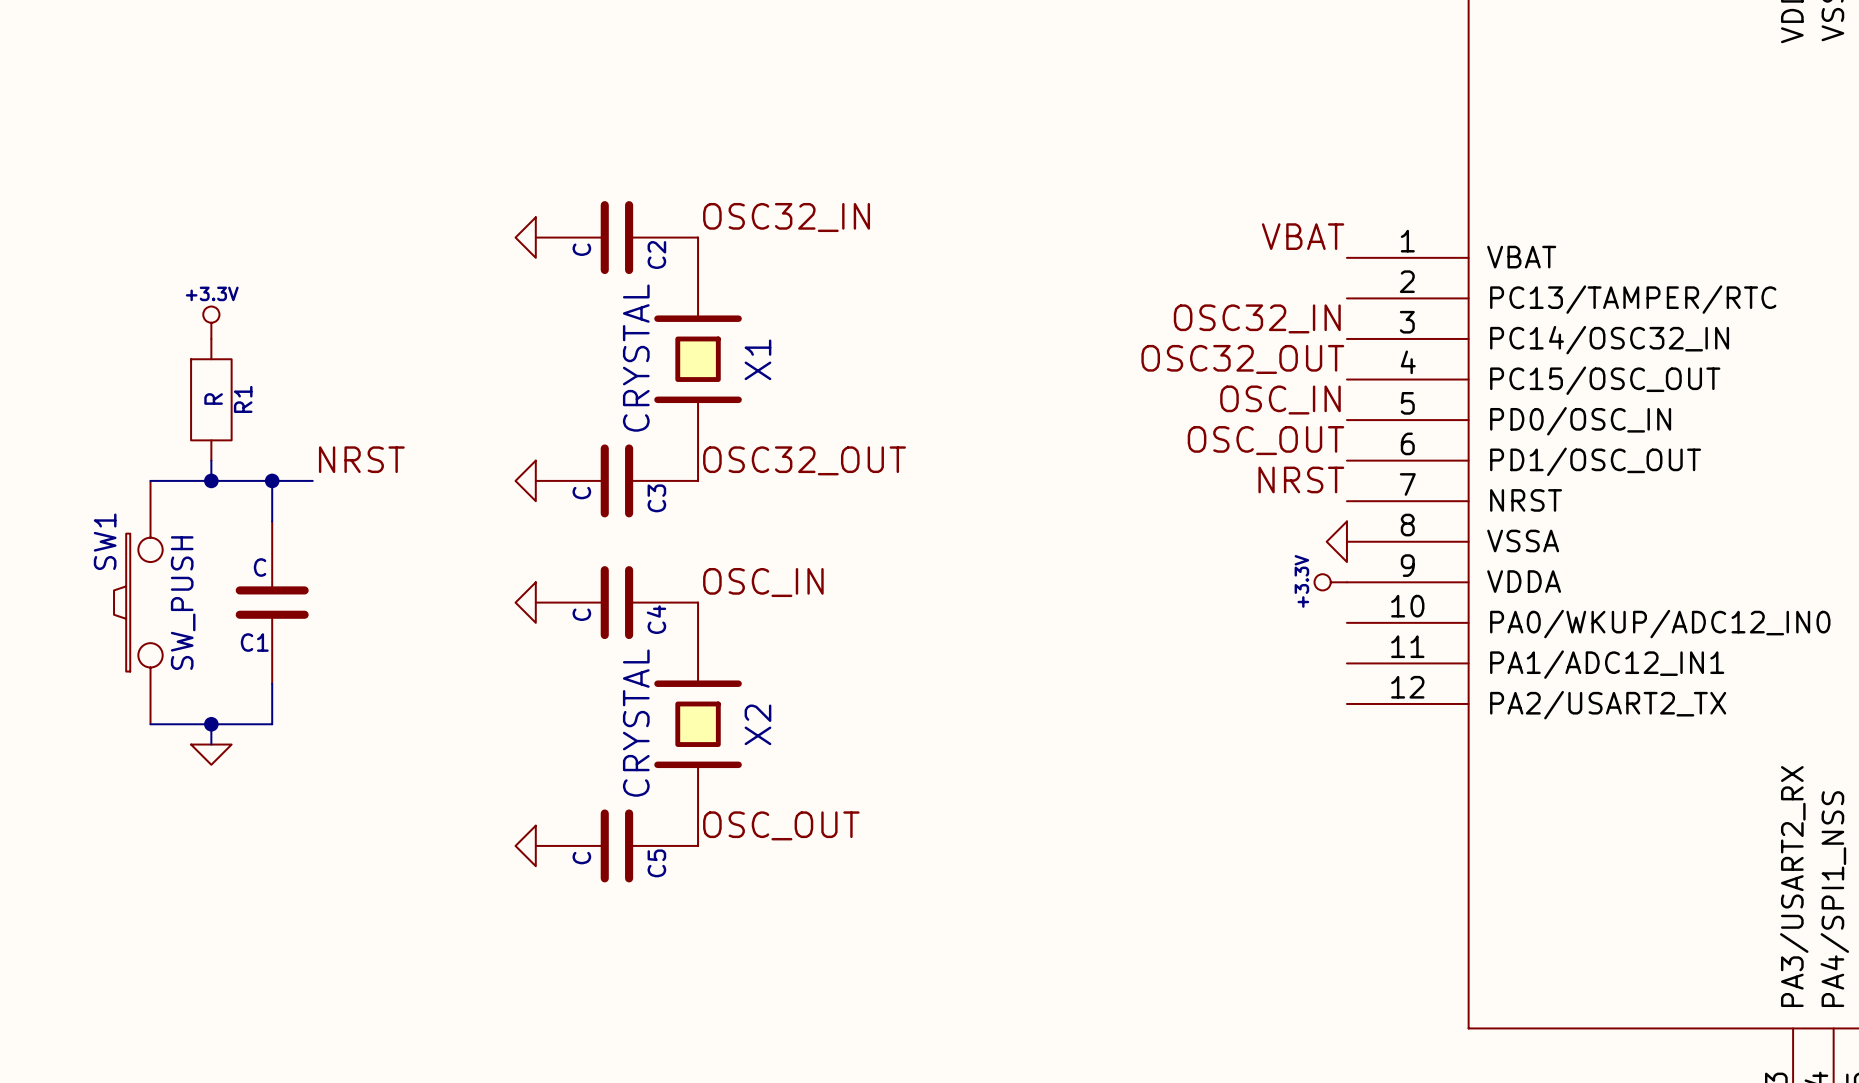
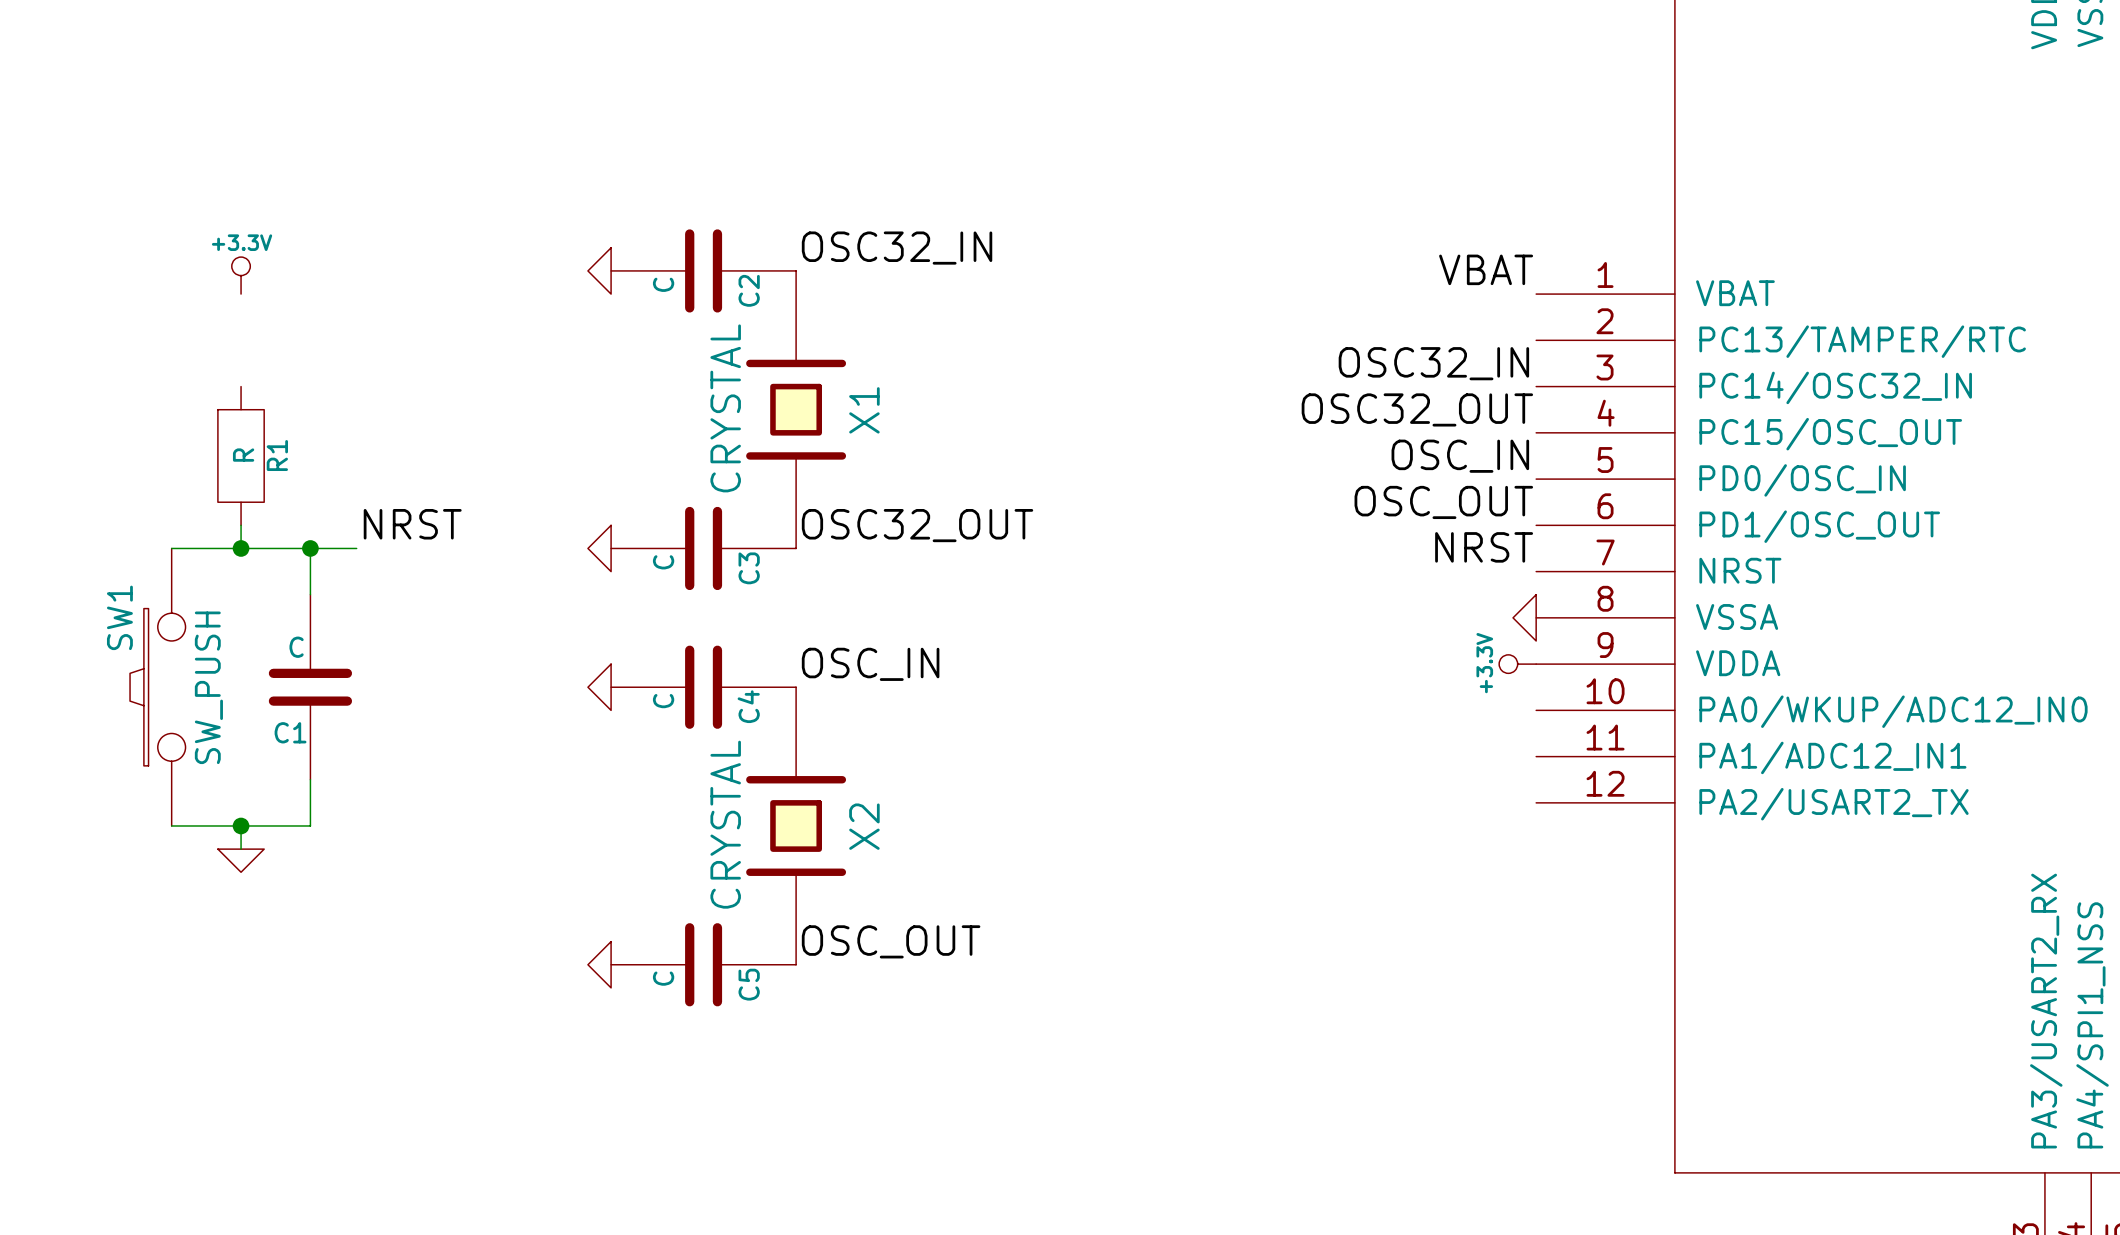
power symbol position: +3.3V (211, 322) -> +3.3V (241, 275)

